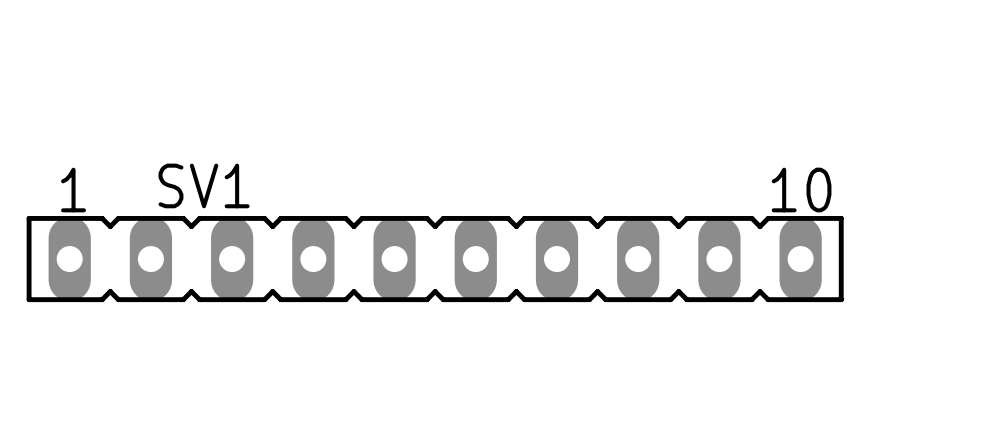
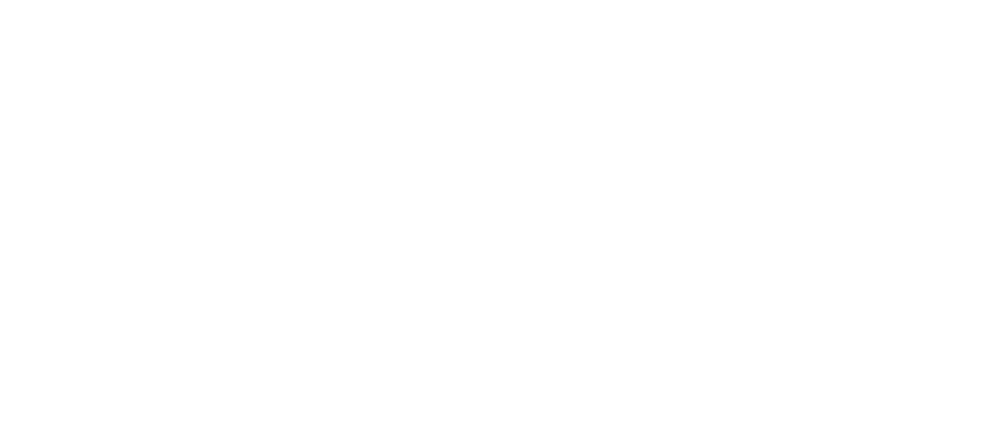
SV1: (435, 259) -> none

